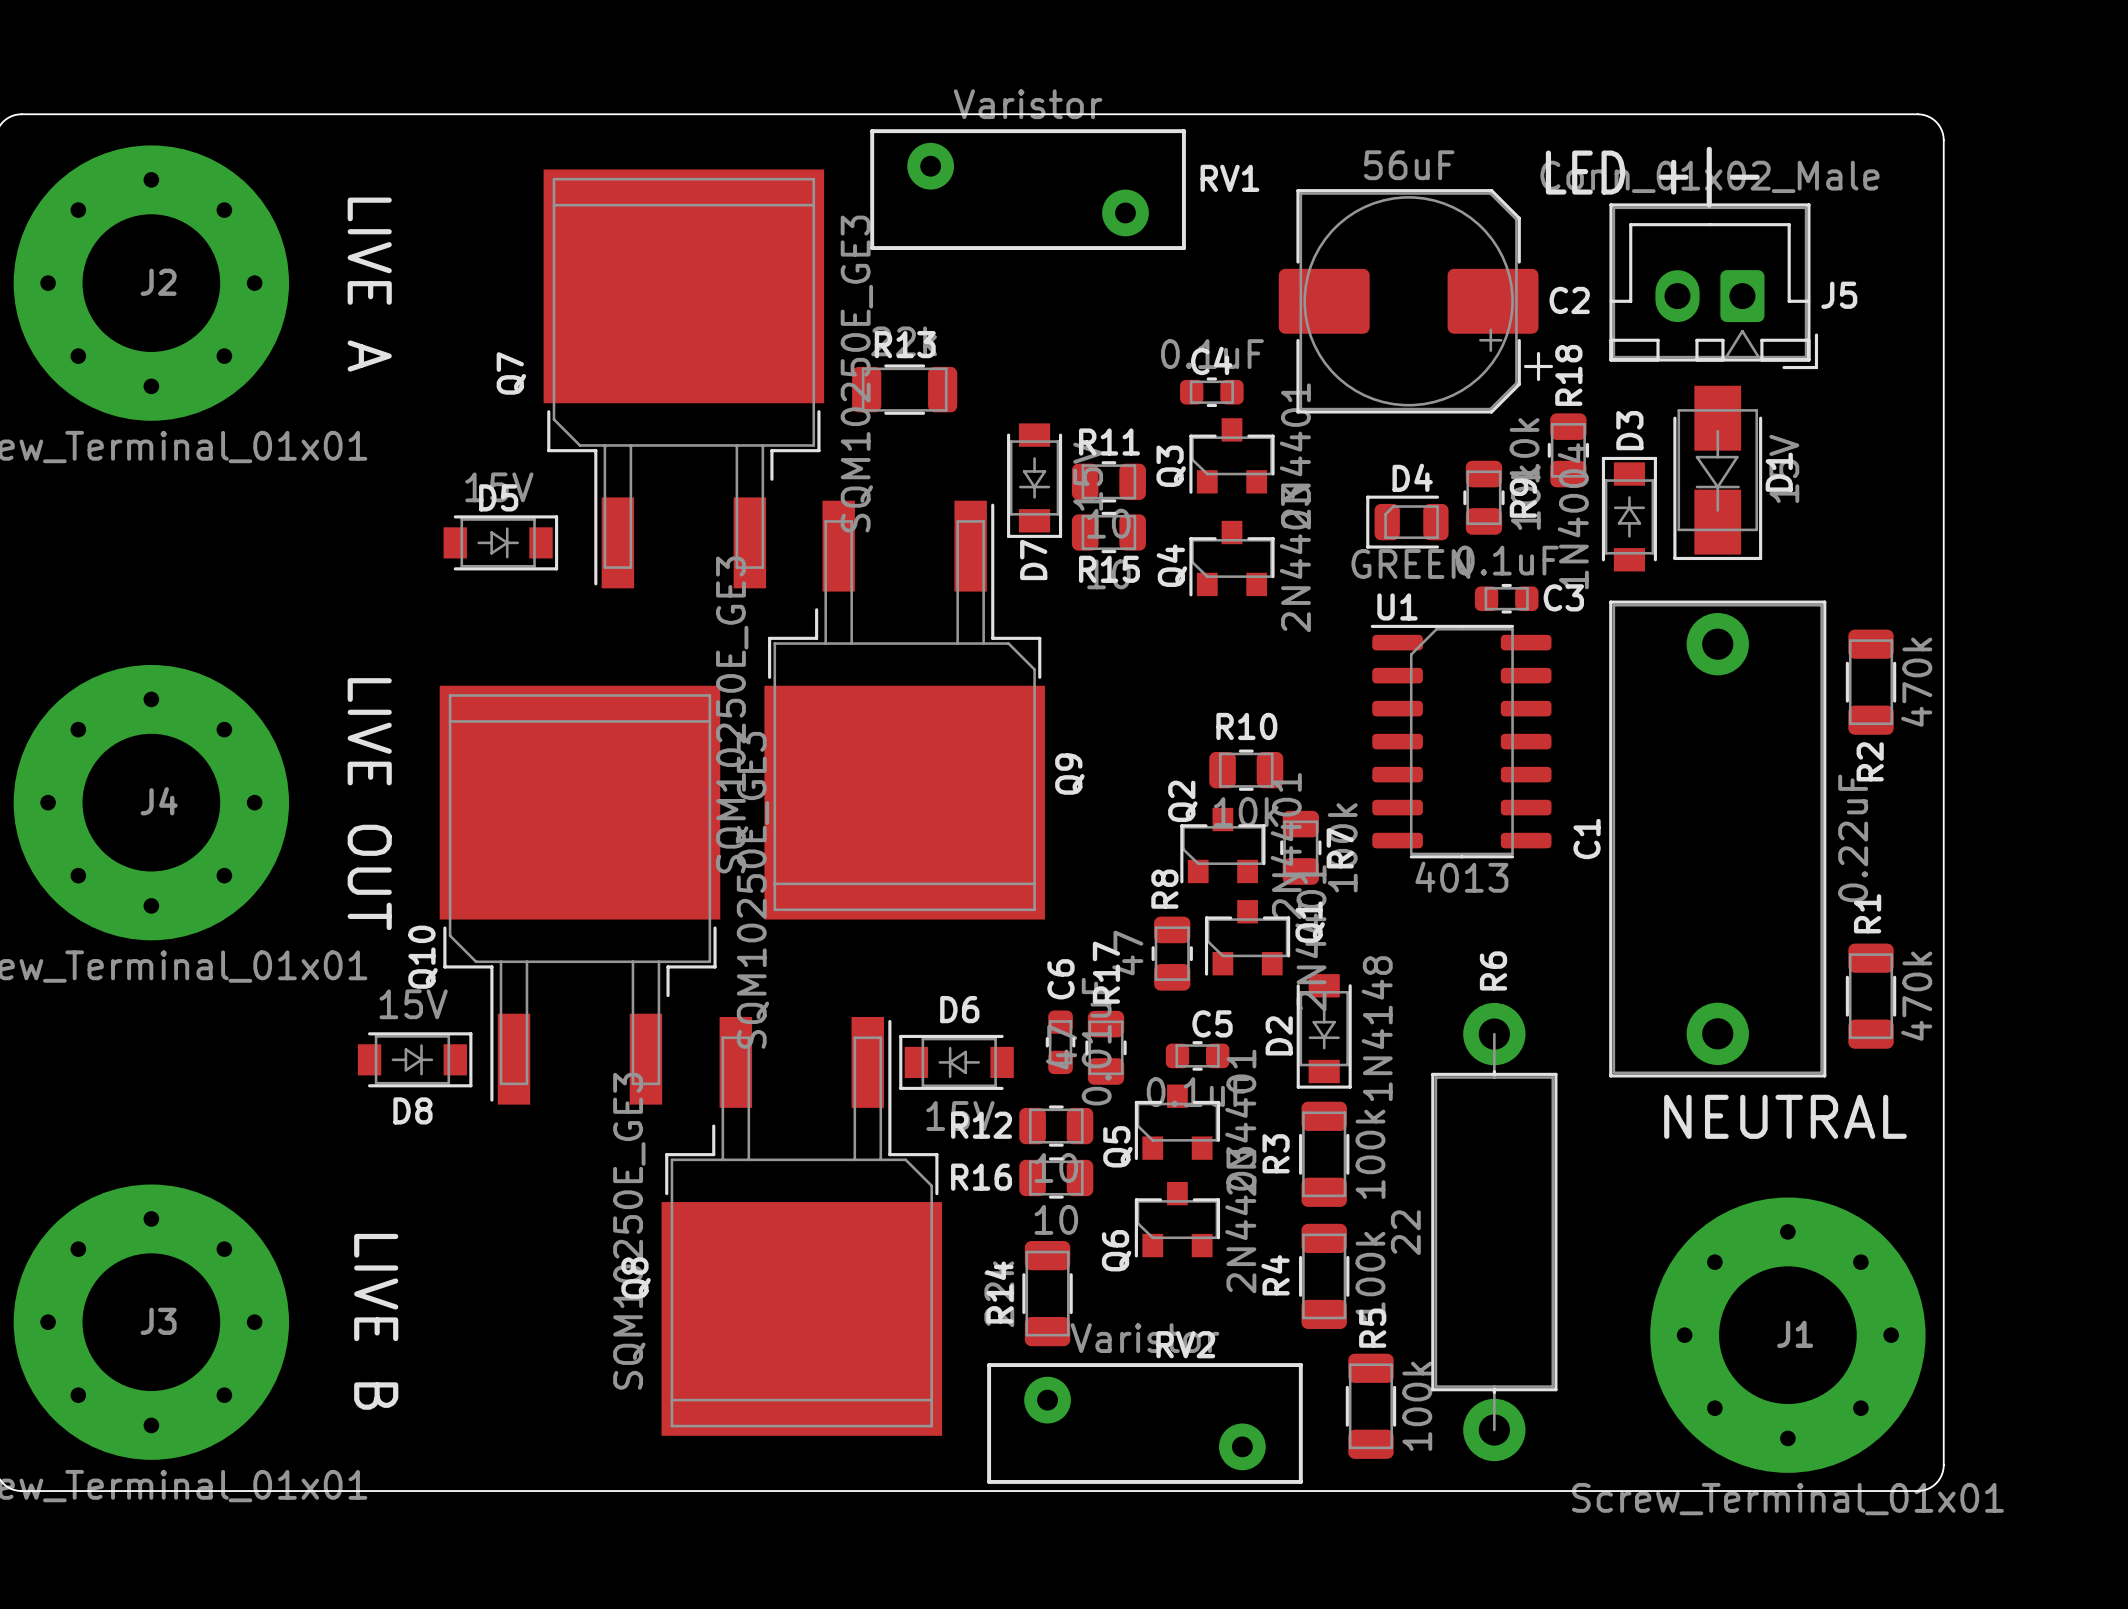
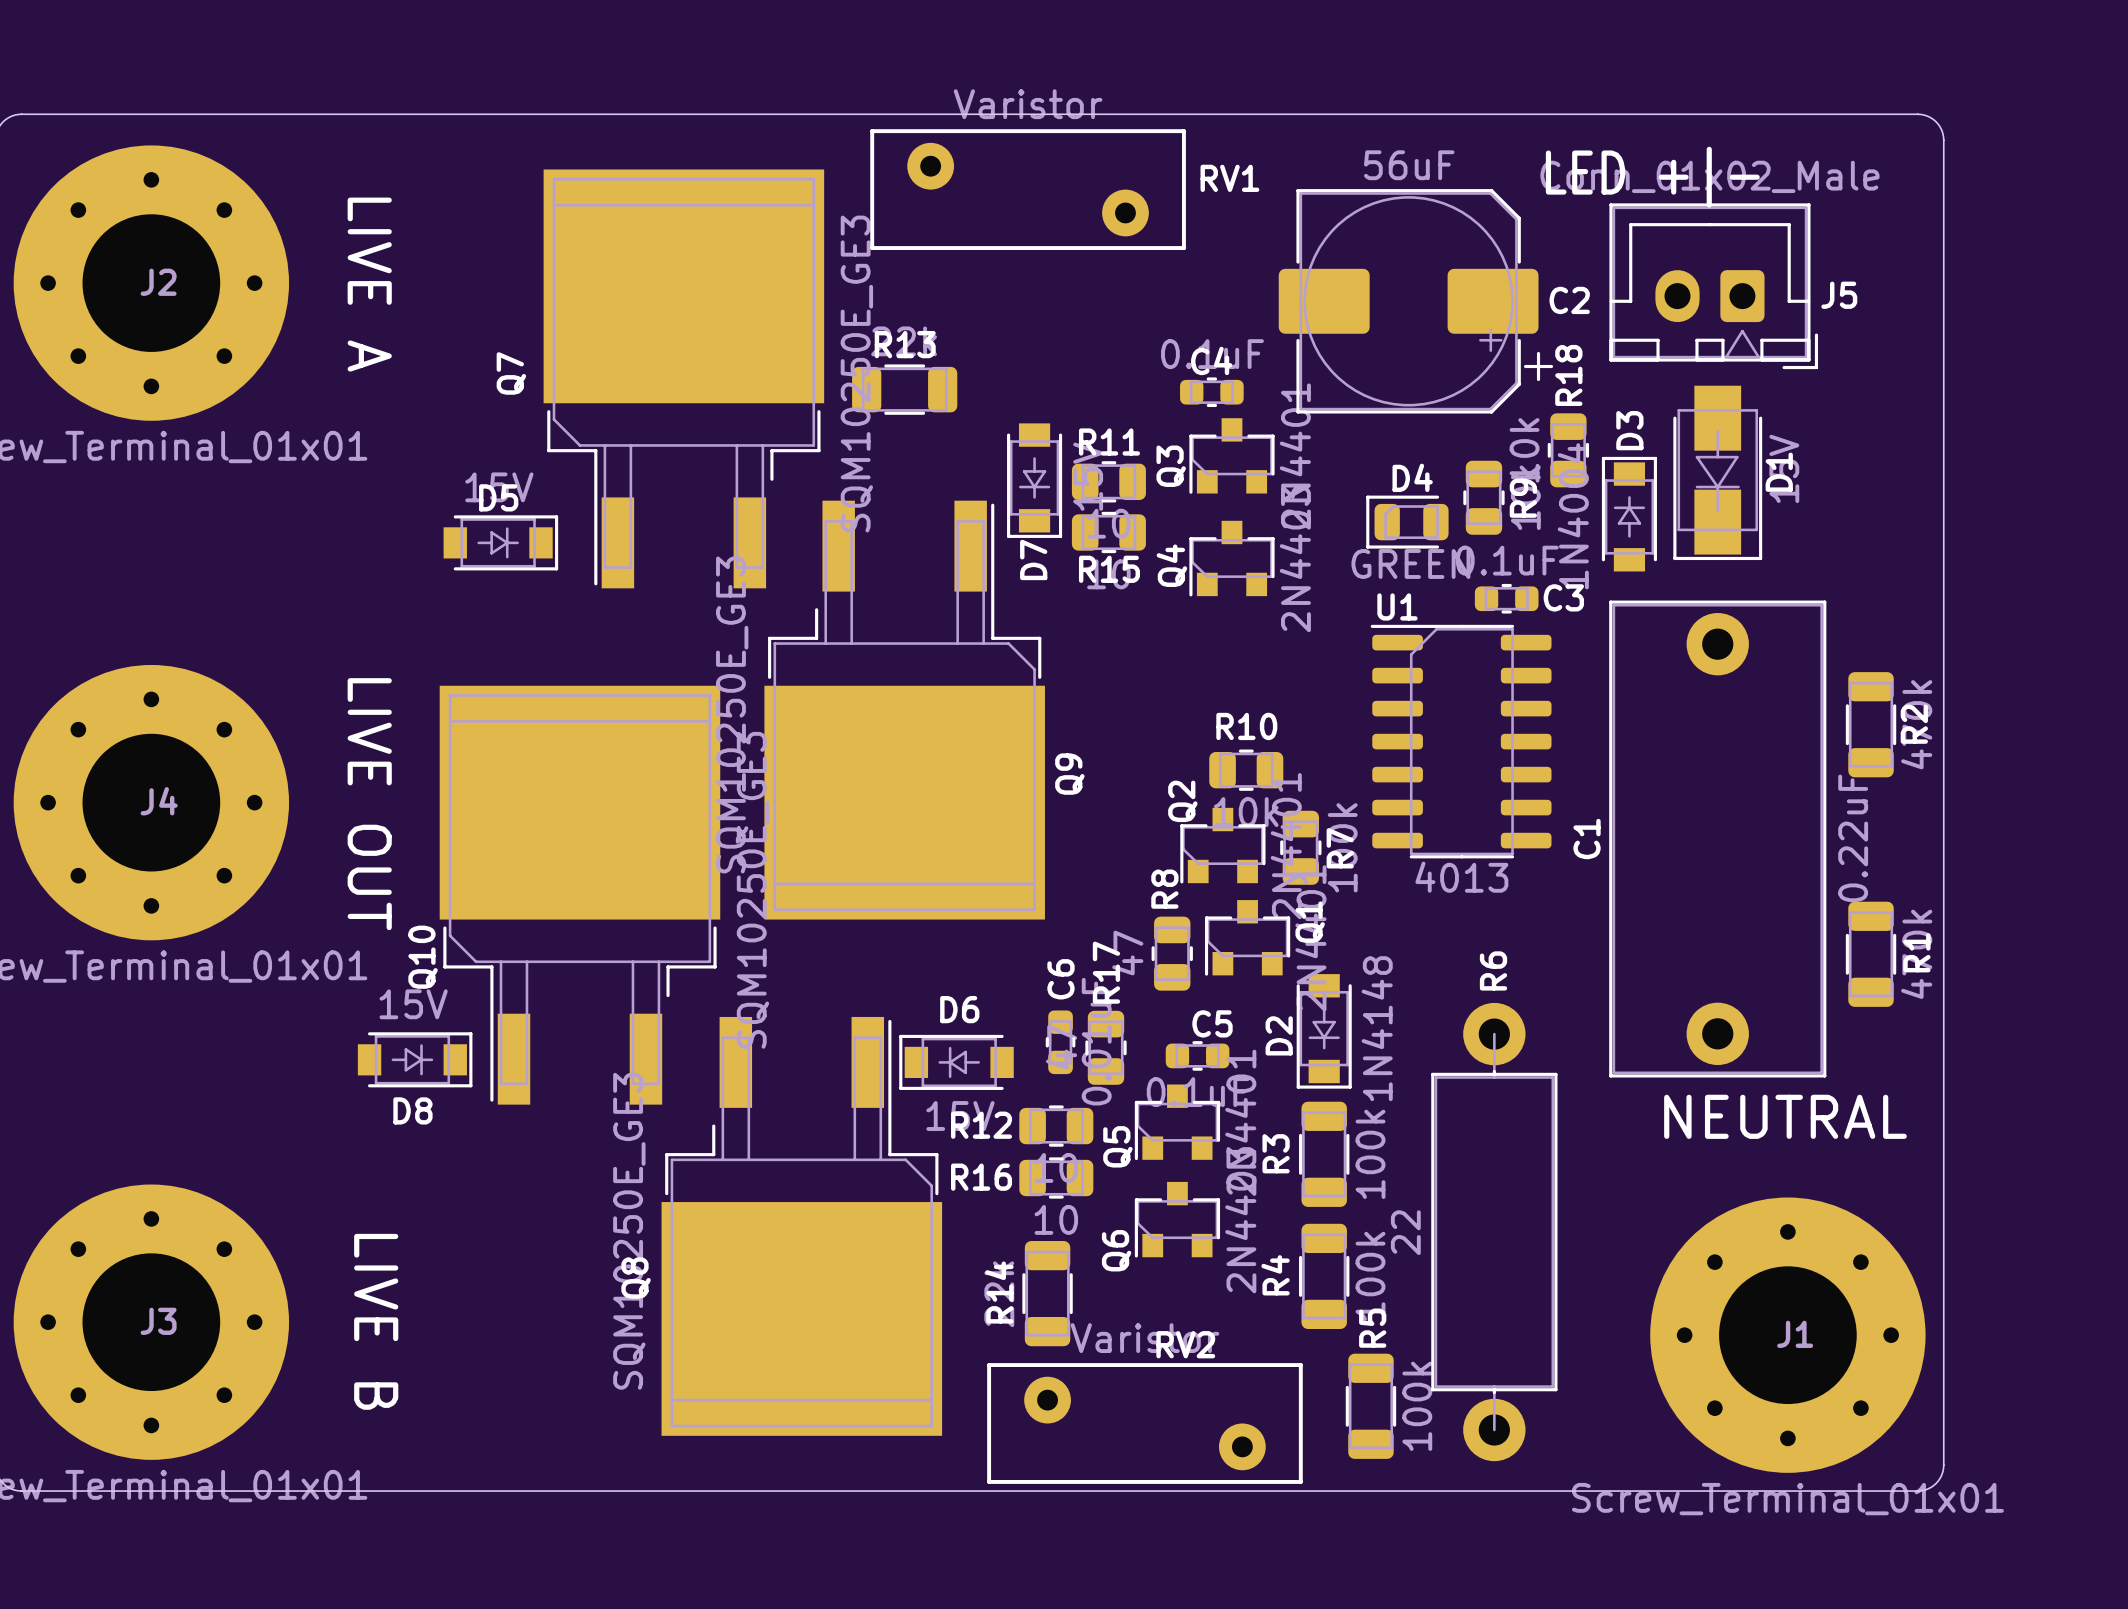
R2 position: (1871, 682) -> (1871, 724)
R2 name position: R2 (1870, 761) -> R2 (1914, 724)
R1 name position: R1 (1867, 913) -> R1 (1916, 952)
R1 position: (1871, 996) -> (1871, 954)

